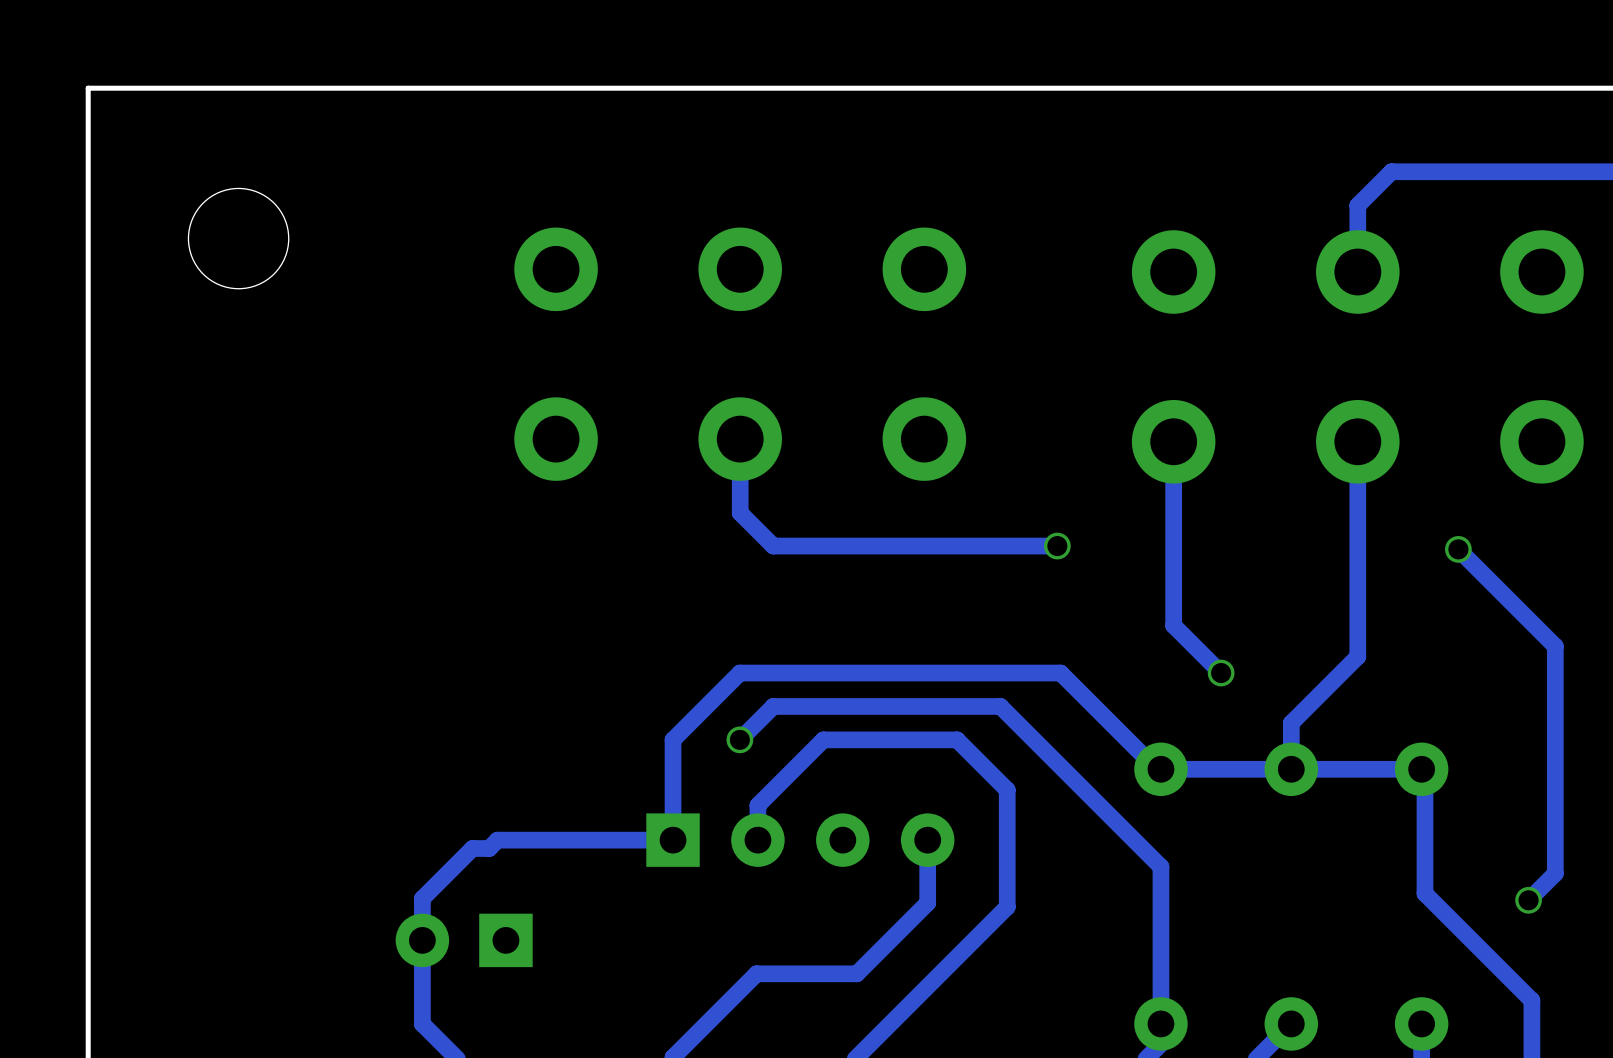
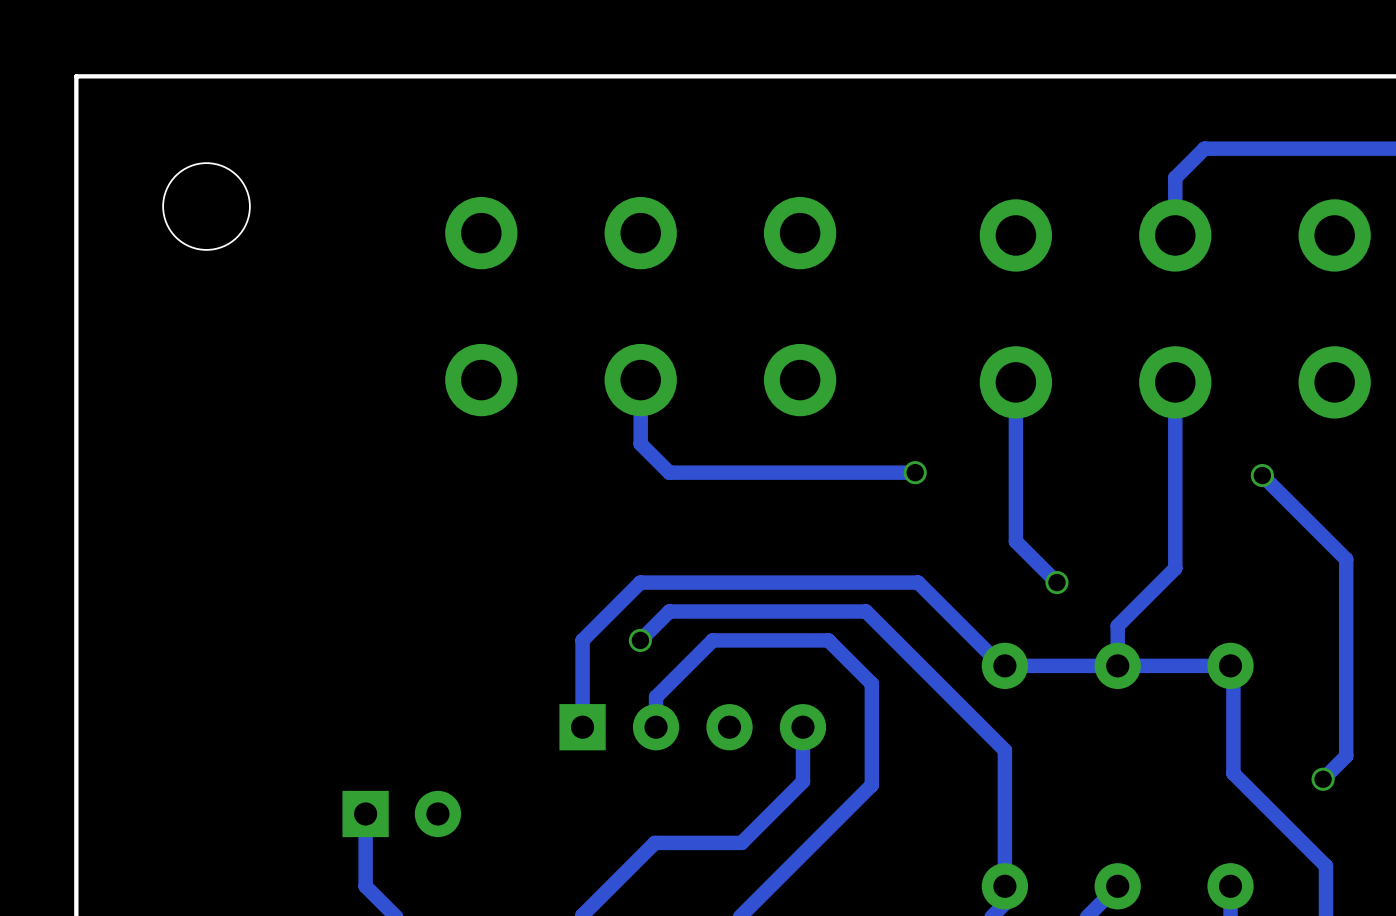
track: (673, 840) (497, 840) (489, 848) (472, 848) (422, 898) (422, 940) -> none
part rotation: 0° (464, 940) -> 180° (401, 813)

